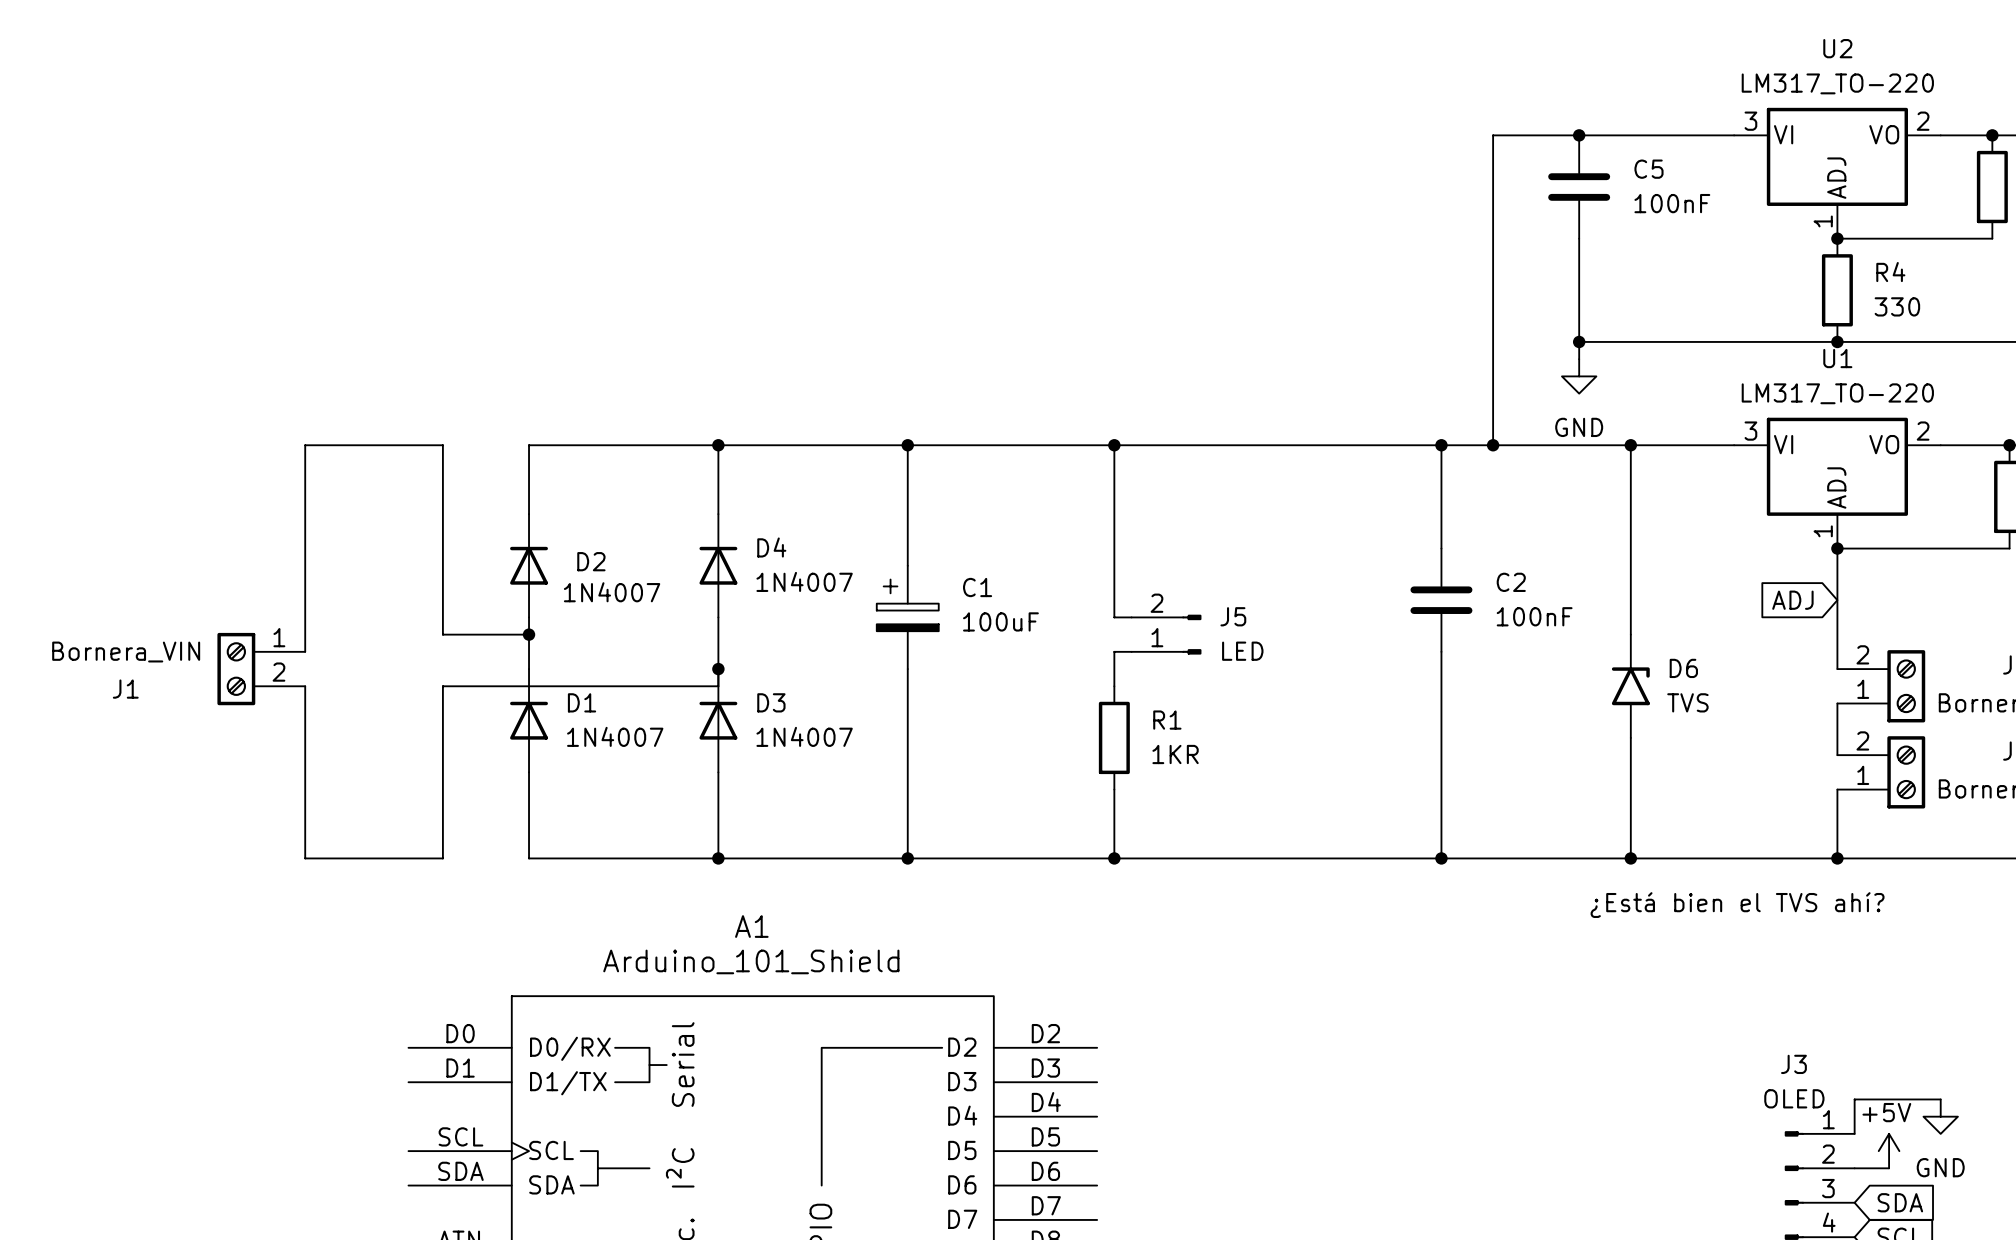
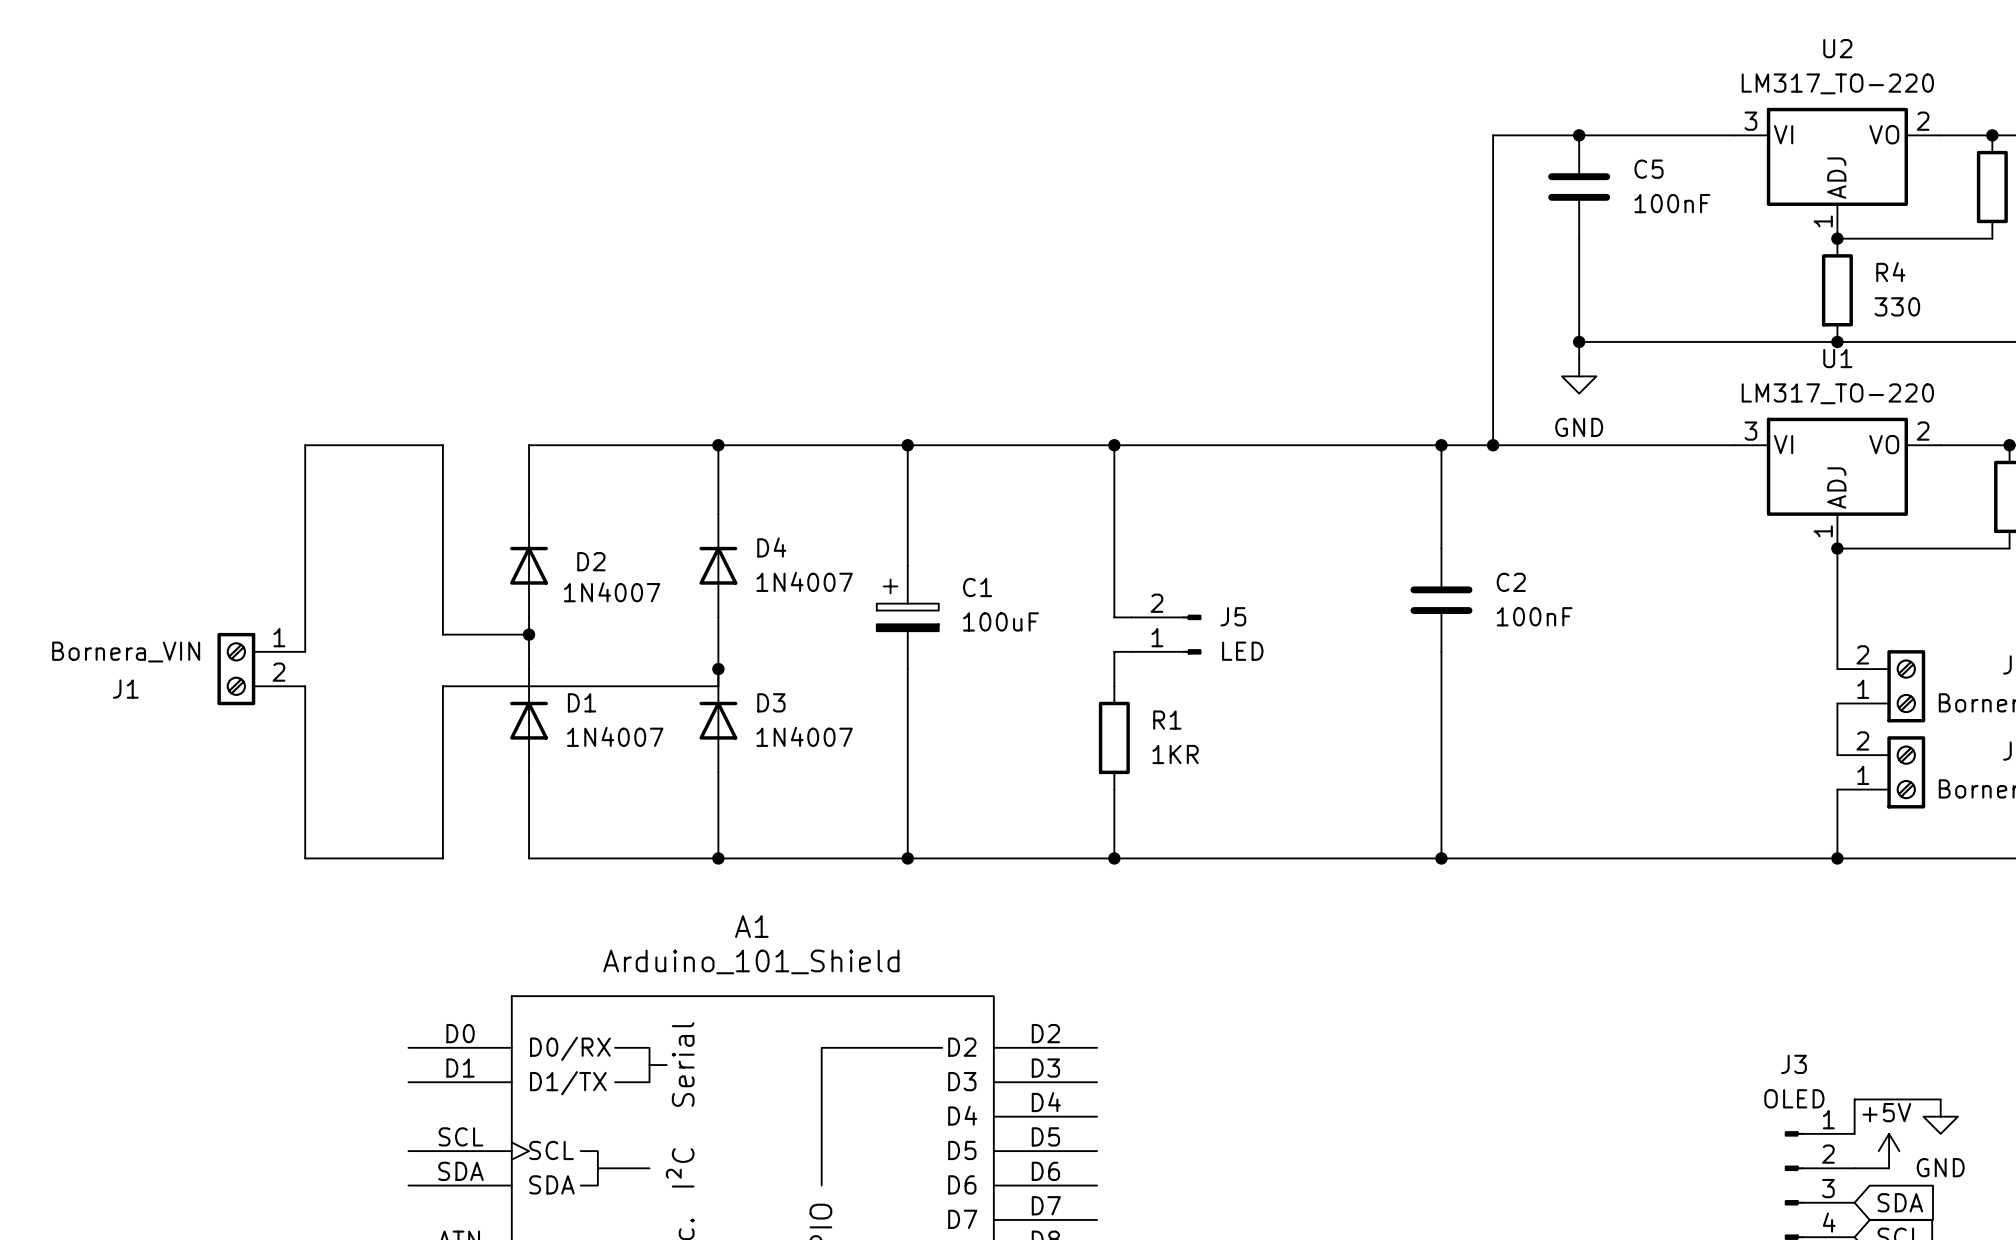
wire: (1630, 445) (1630, 634) -> none
junction: (1630, 445) -> none
global label: ADJ (1792, 600) -> none
D6: TVS (1630, 686) -> none
wire: (1630, 737) (1630, 858) -> none
junction: (1630, 858) -> none
text: ¿Está bien el TVS ahí? (1737, 905) -> none

